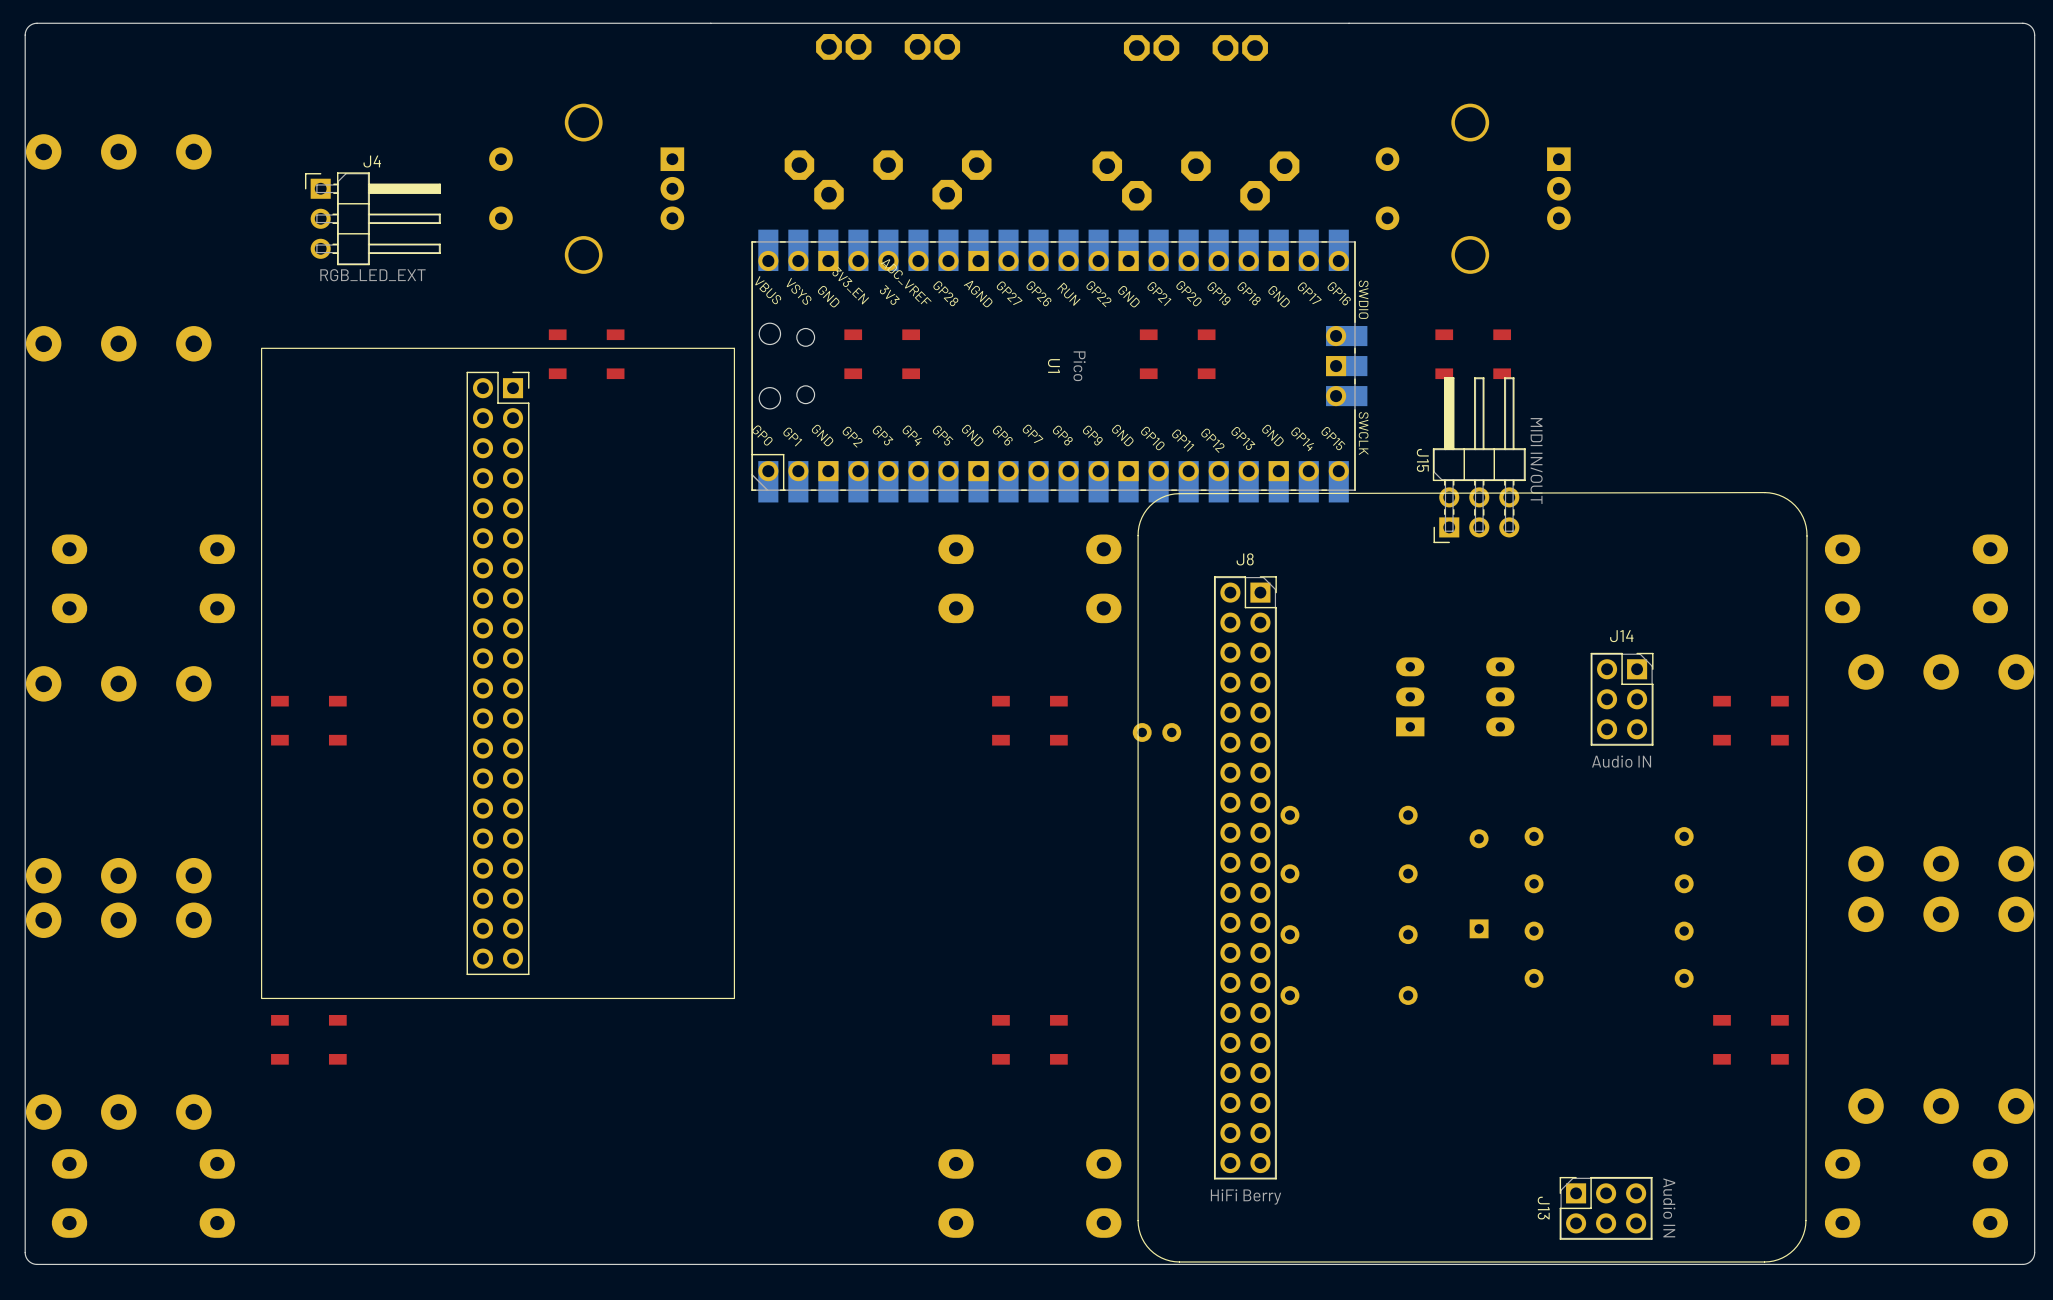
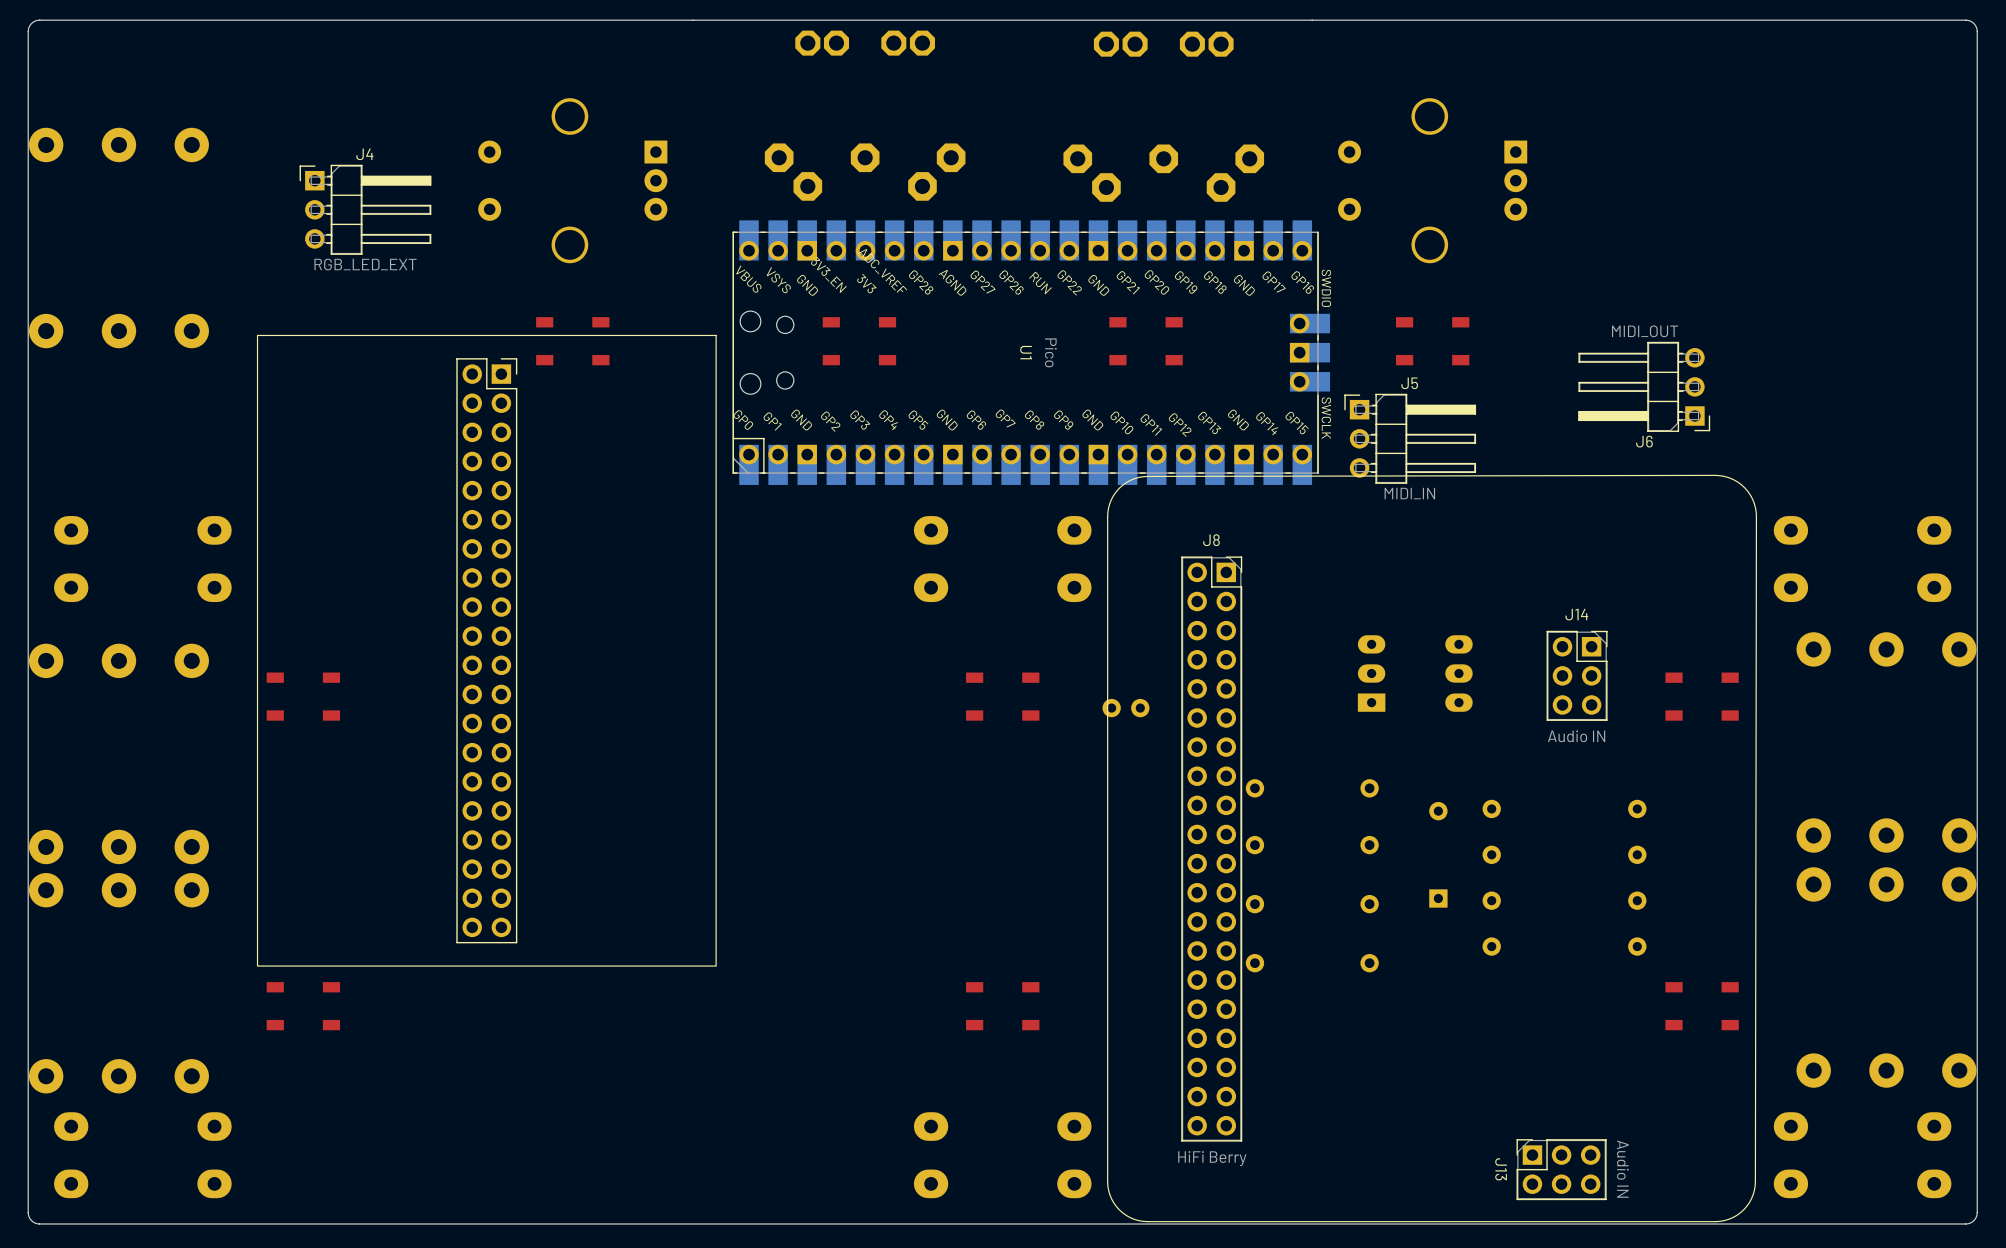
J6: none -> MIDI_OUT (1644, 386)
J5: none -> MIDI_IN (1410, 438)
J15: MIDI IN/OUT (1479, 460) -> none

